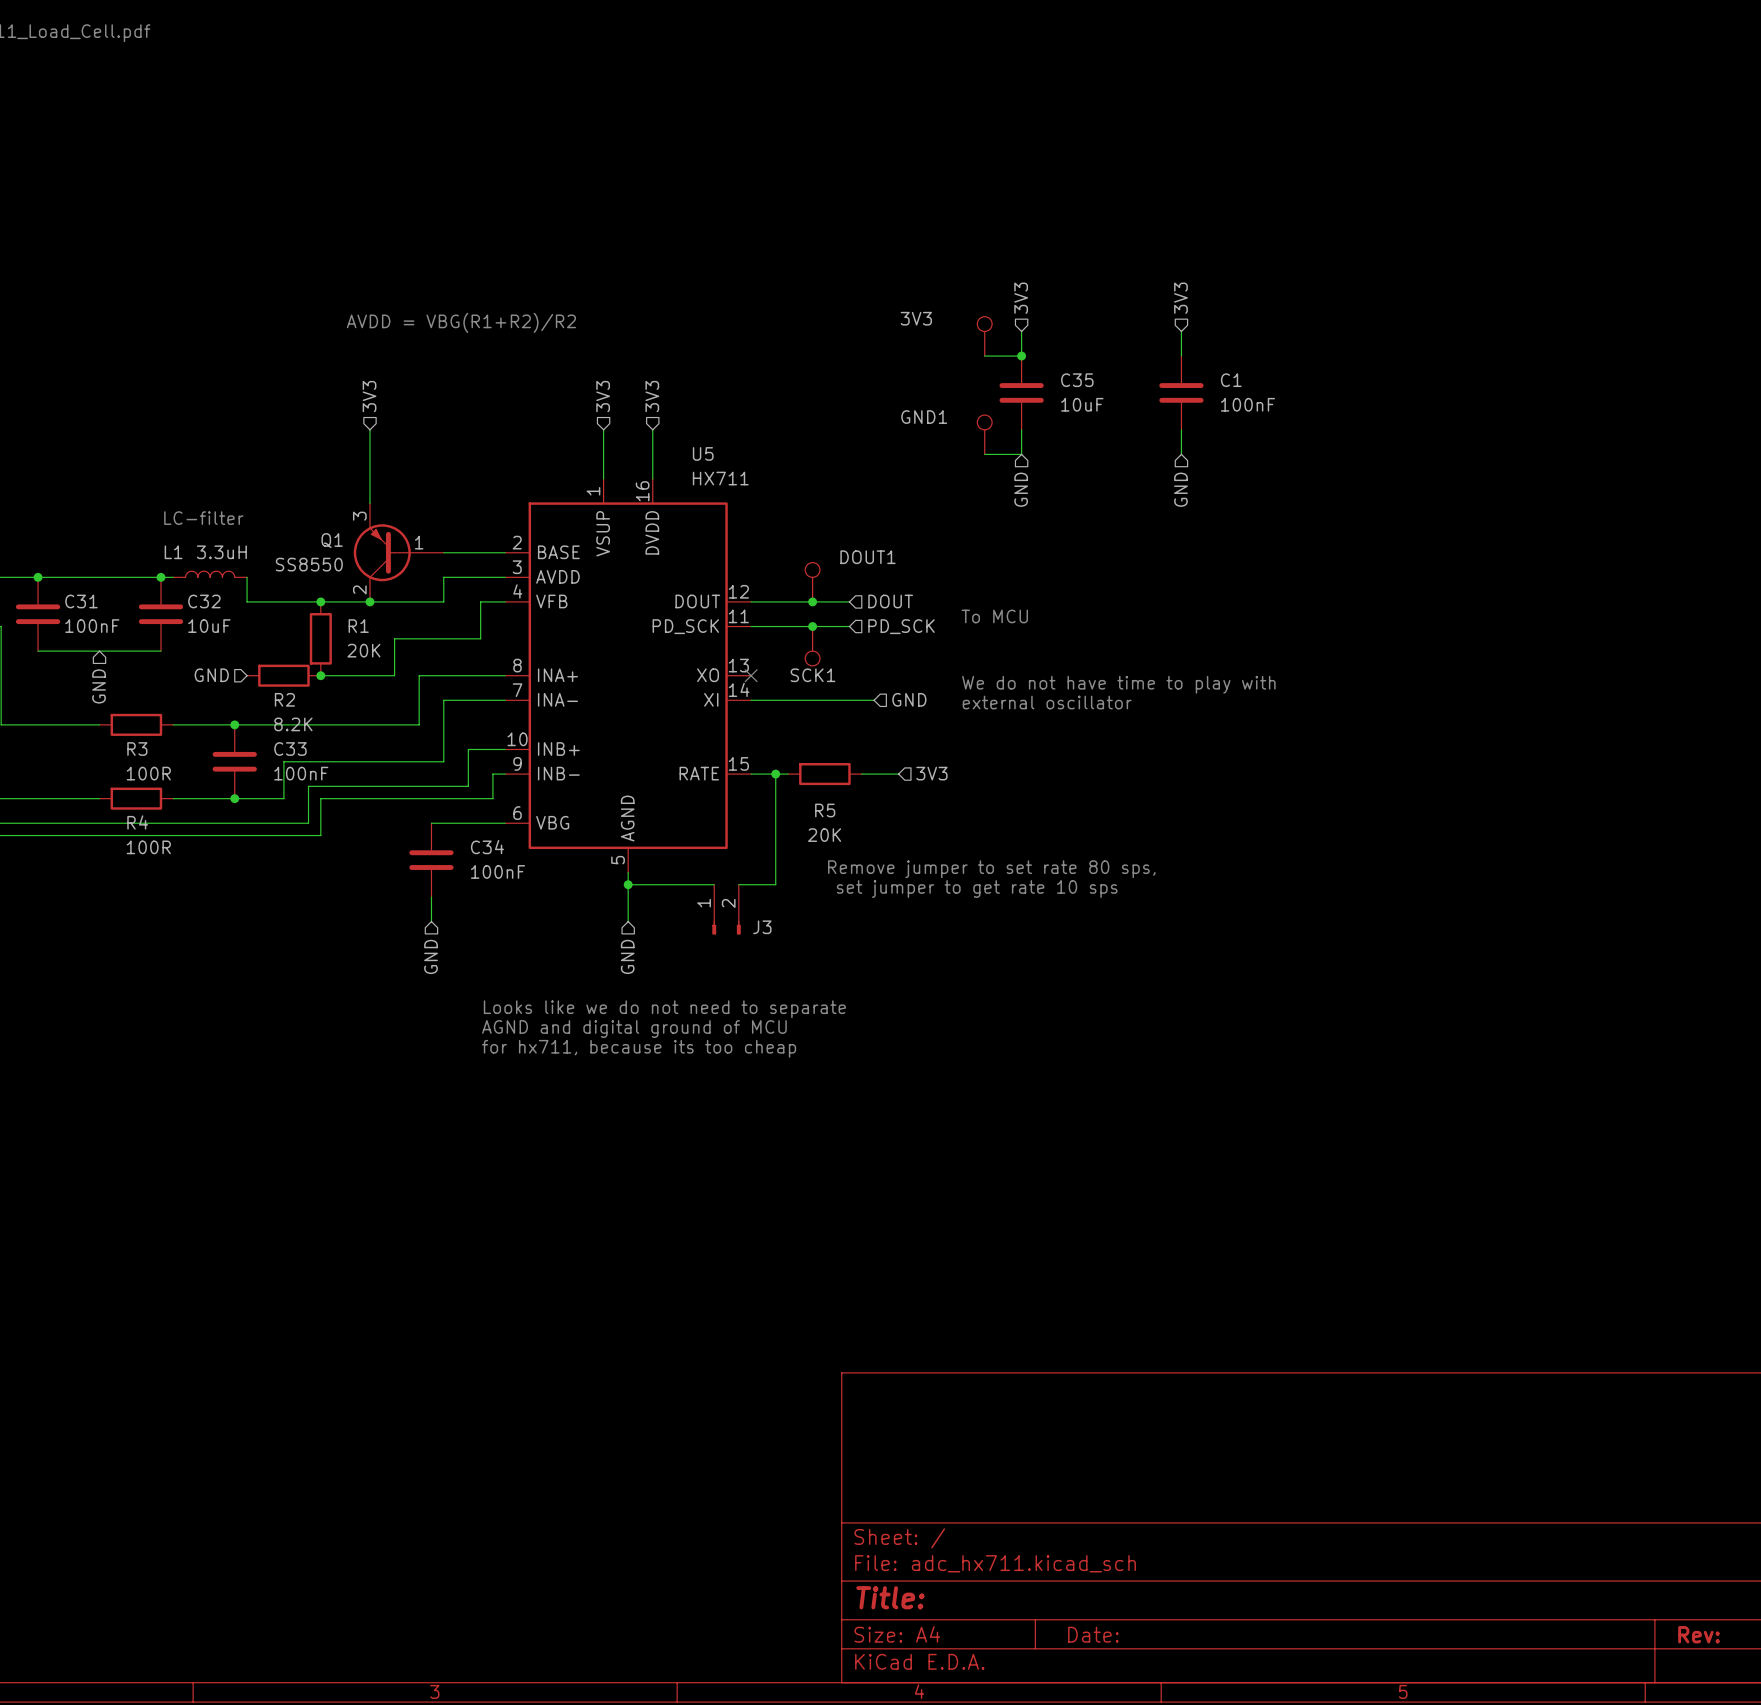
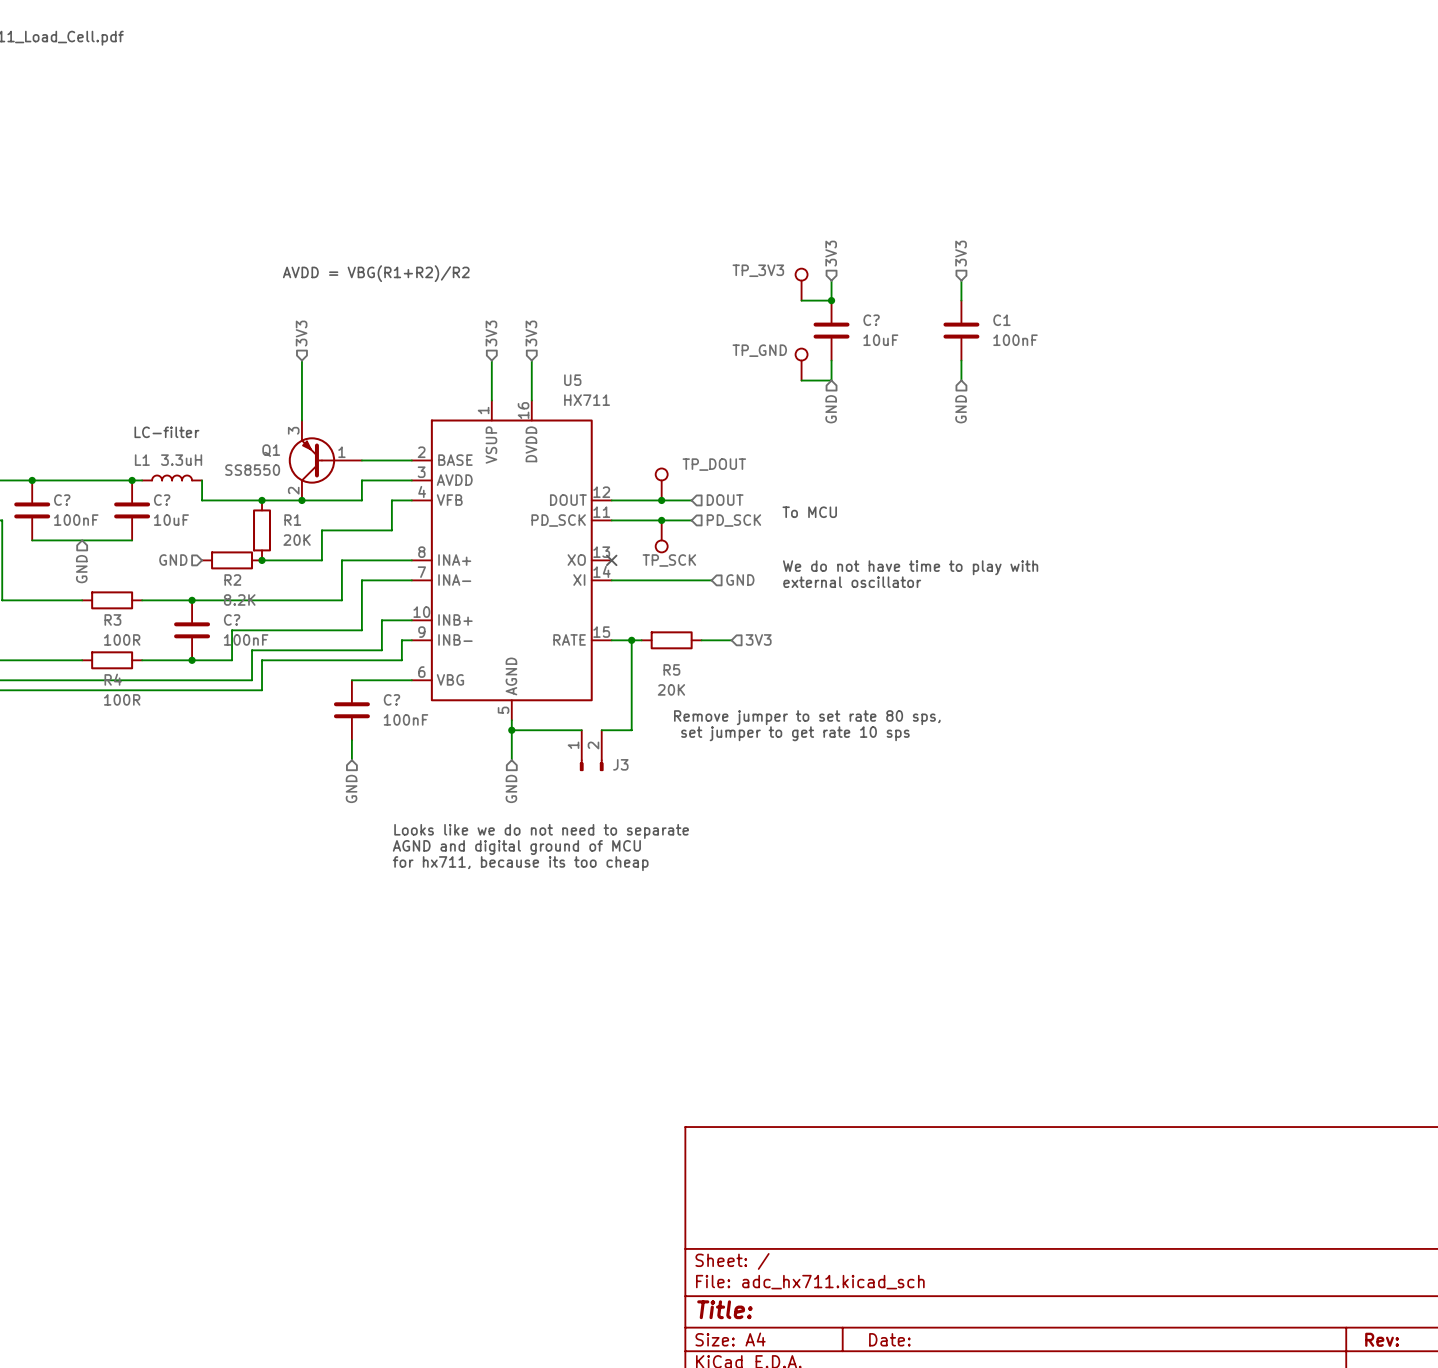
3V3 name: 3V3 (916, 318) -> TP_3V3 (758, 270)
C35 name: C35 (1077, 380) -> C? (871, 320)
GND1 name: GND1 (924, 417) -> TP_GND (759, 350)
DOUT1 name: DOUT1 (868, 557) -> TP_DOUT (714, 464)
C31 name: C31 (81, 601) -> C? (62, 500)
C32 name: C32 (204, 601) -> C? (162, 500)
SCK1 name: SCK1 (812, 675) -> TP_SCK (669, 560)
C33 name: C33 (290, 749) -> C? (232, 619)
C34 name: C34 (487, 847) -> C? (391, 699)

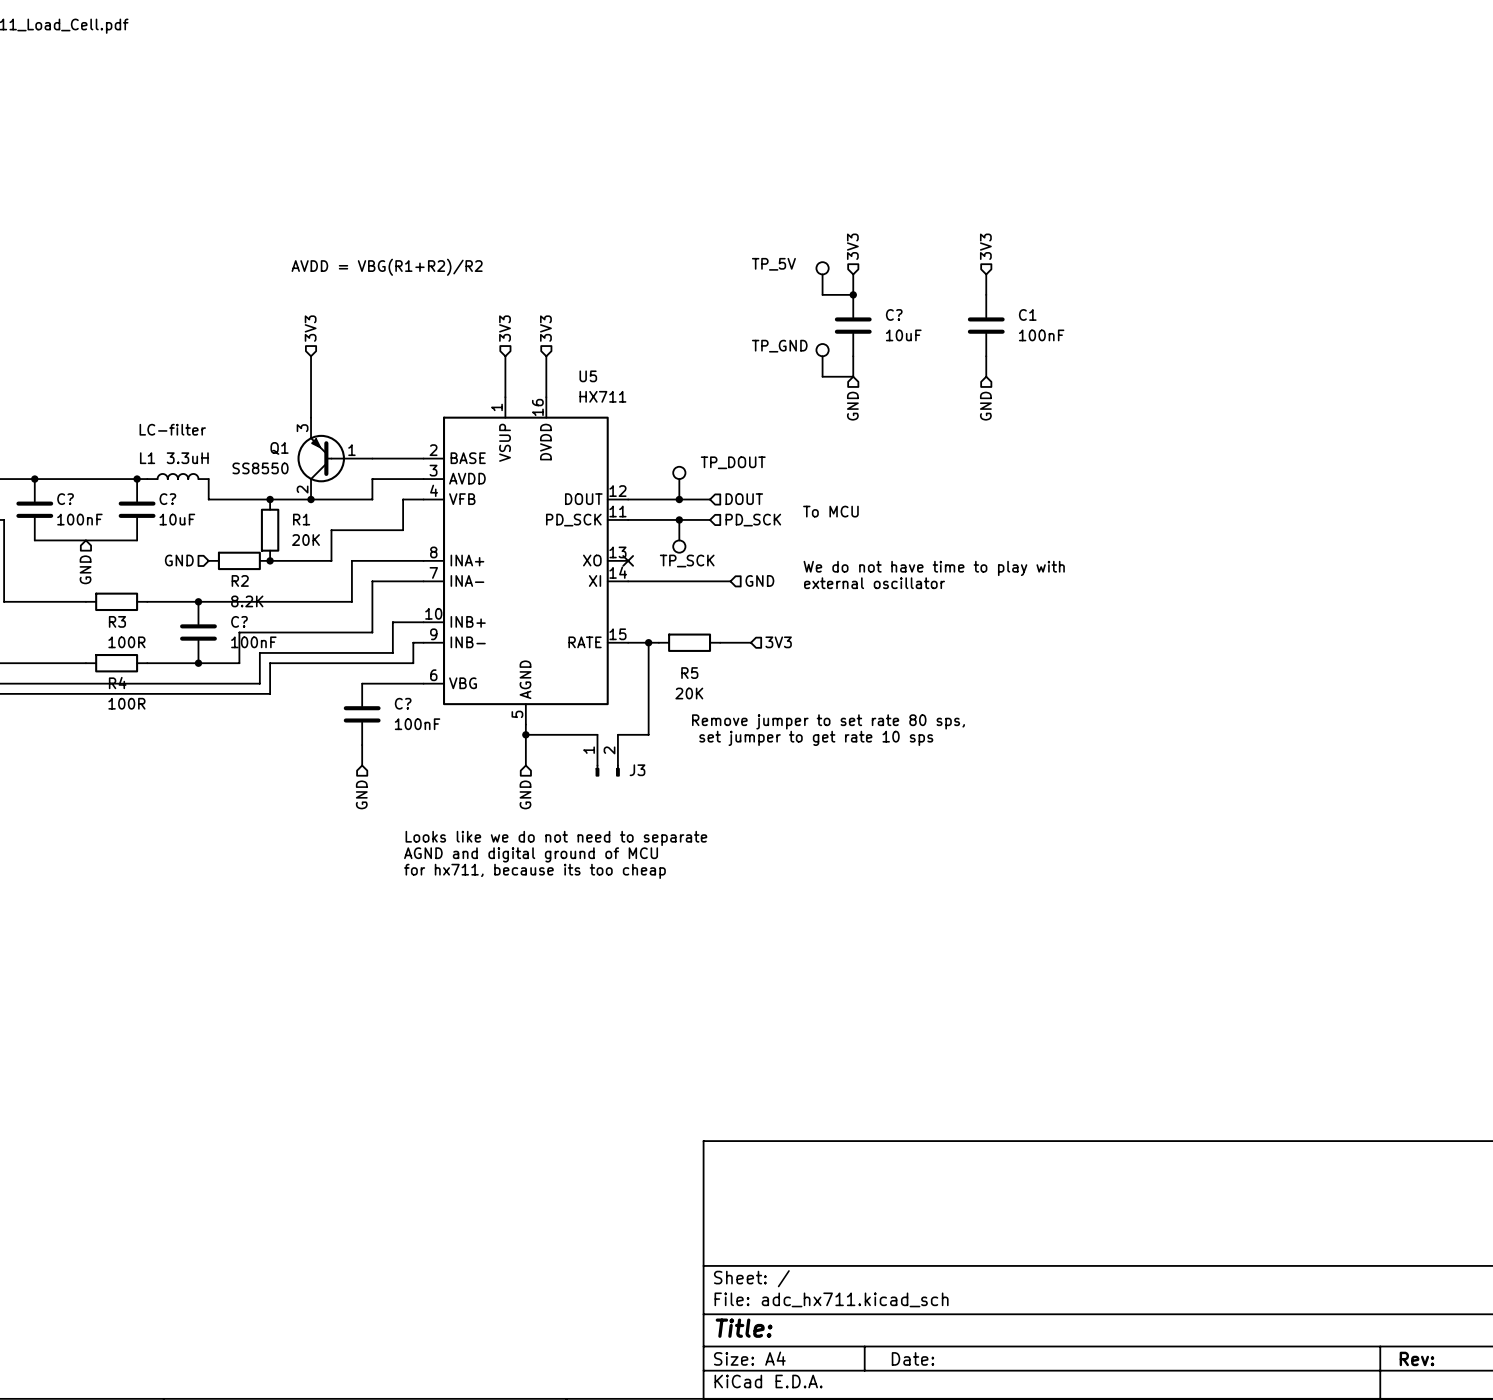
TP_3V3 name: TP_3V3 (758, 270) -> TP_5V (773, 264)

